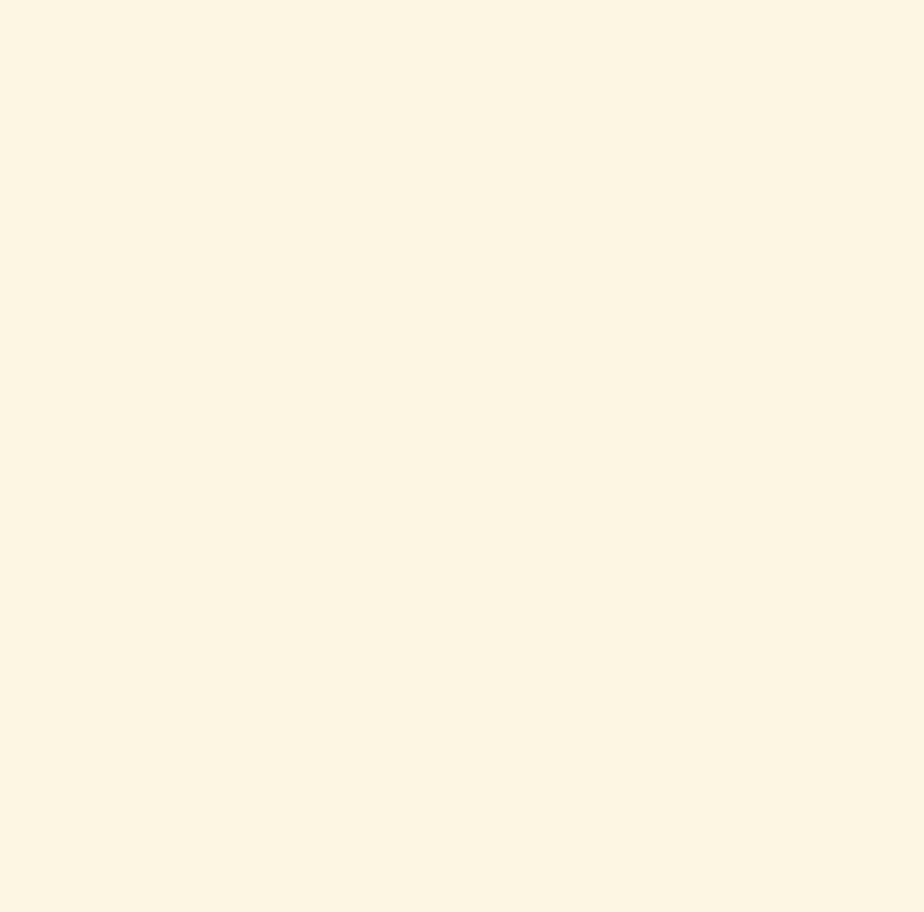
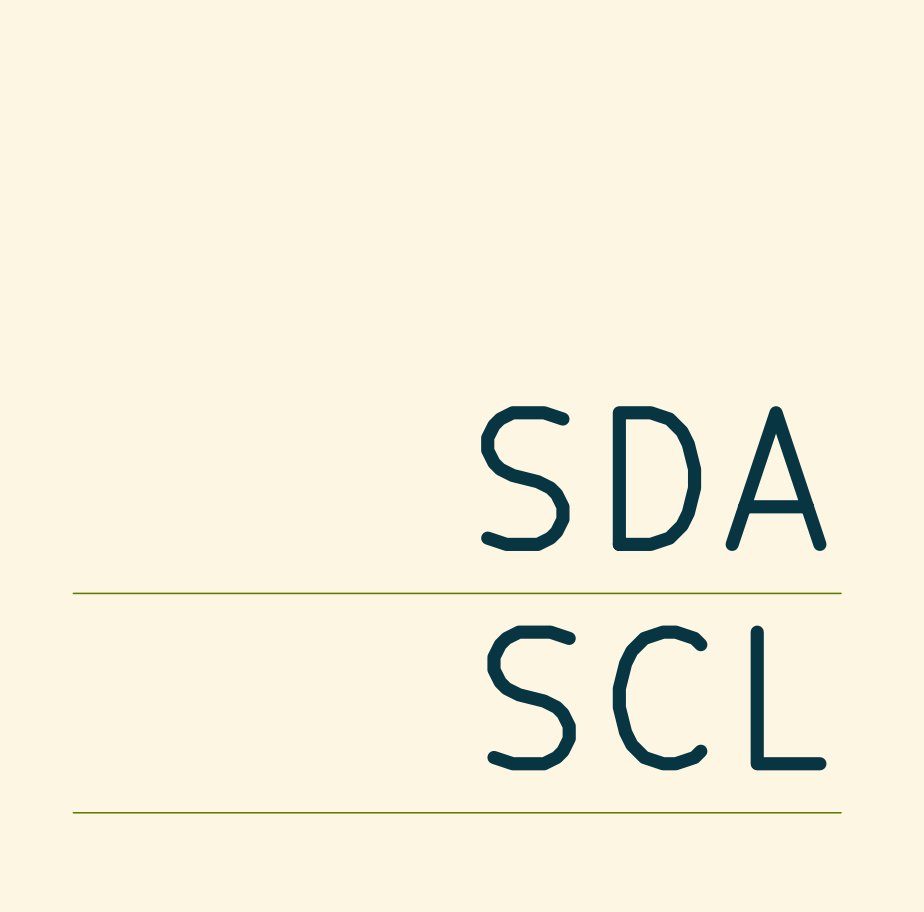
label: none -> SDA (653, 478)
wire: none -> (73, 593) (841, 593)
label: none -> SCL (656, 697)
wire: none -> (73, 812) (841, 812)

